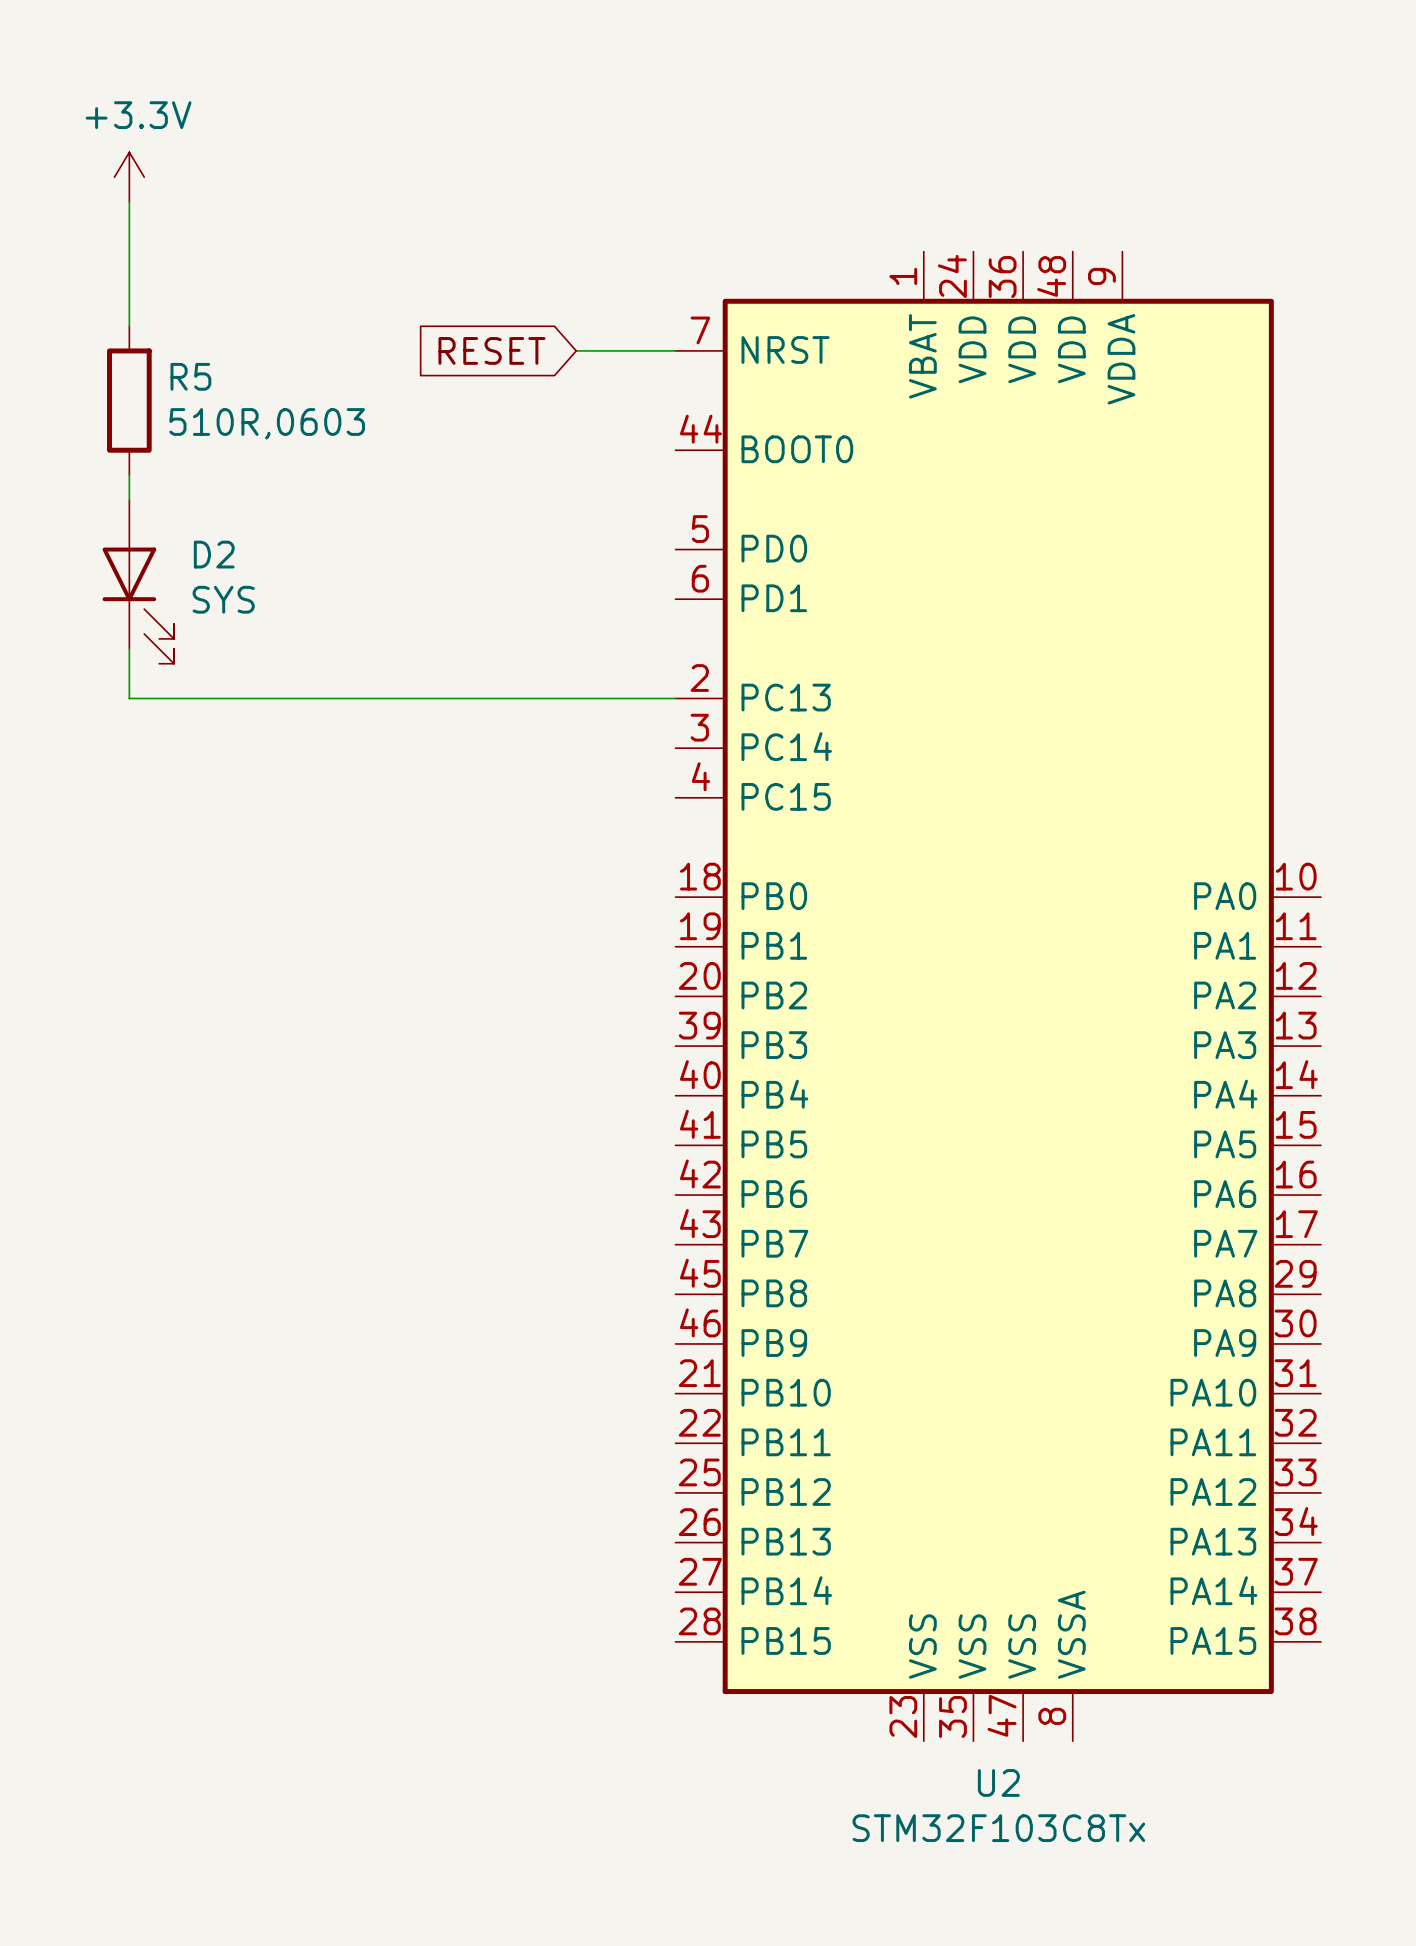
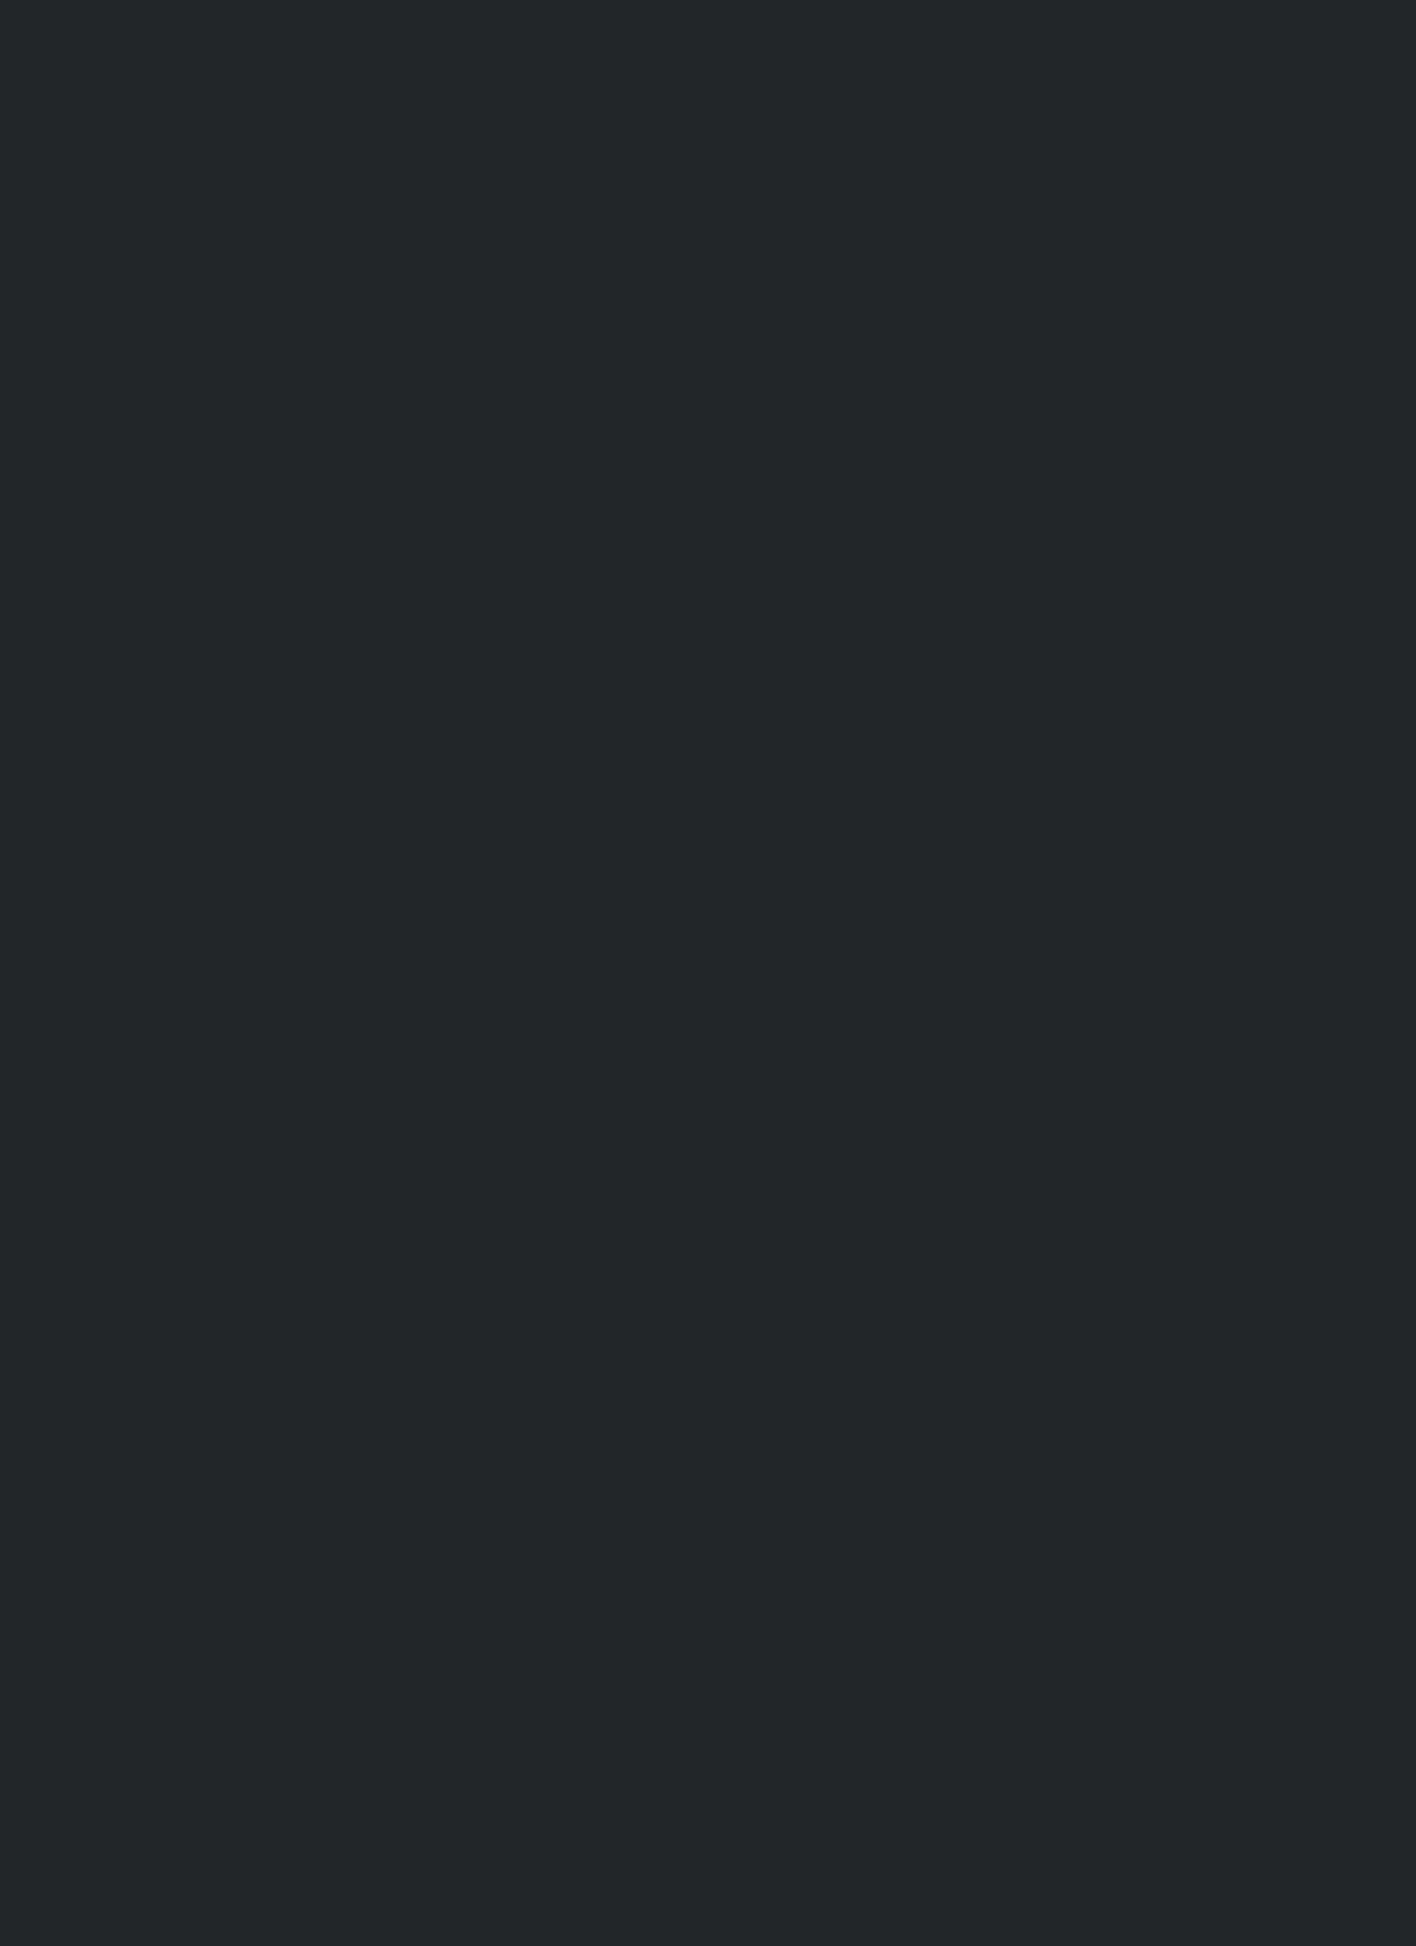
power symbol: +3.3V (129, 177) -> none
wire: (129, 201) (129, 326) -> none
global label: RESET (491, 350) -> none
wire: (576, 350) (675, 350) -> none
R5: 510R,0603 (129, 400) -> none
wire: (129, 475) (129, 499) -> none
D2: SYS (138, 581) -> none
wire: (129, 648) (129, 698) (675, 698) -> none
U2: STM32F103C8Tx (998, 996) -> none

